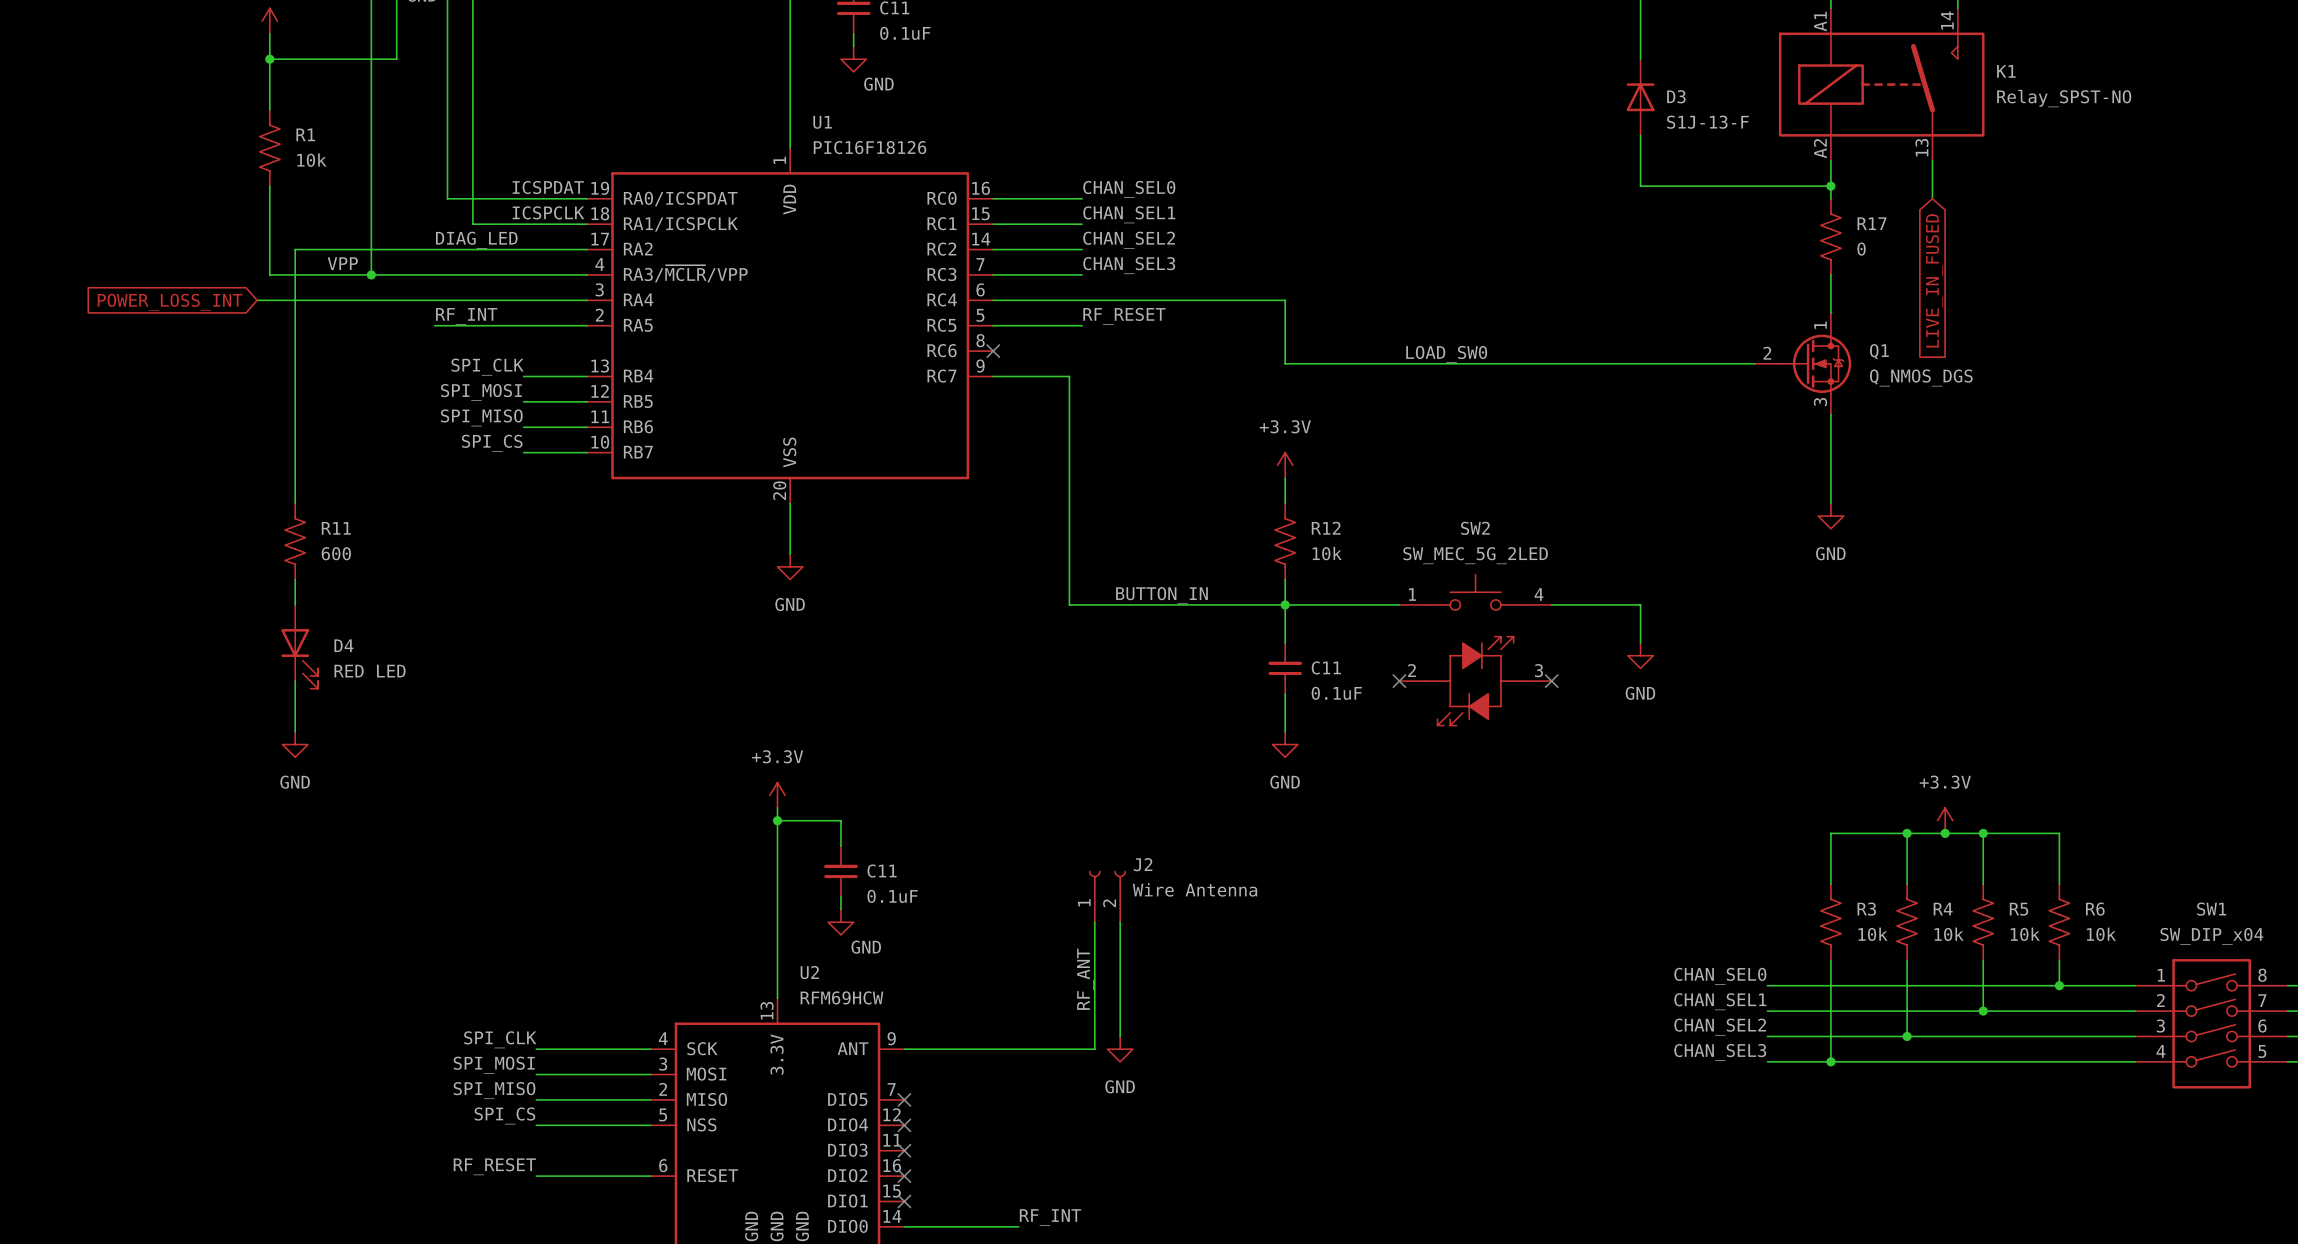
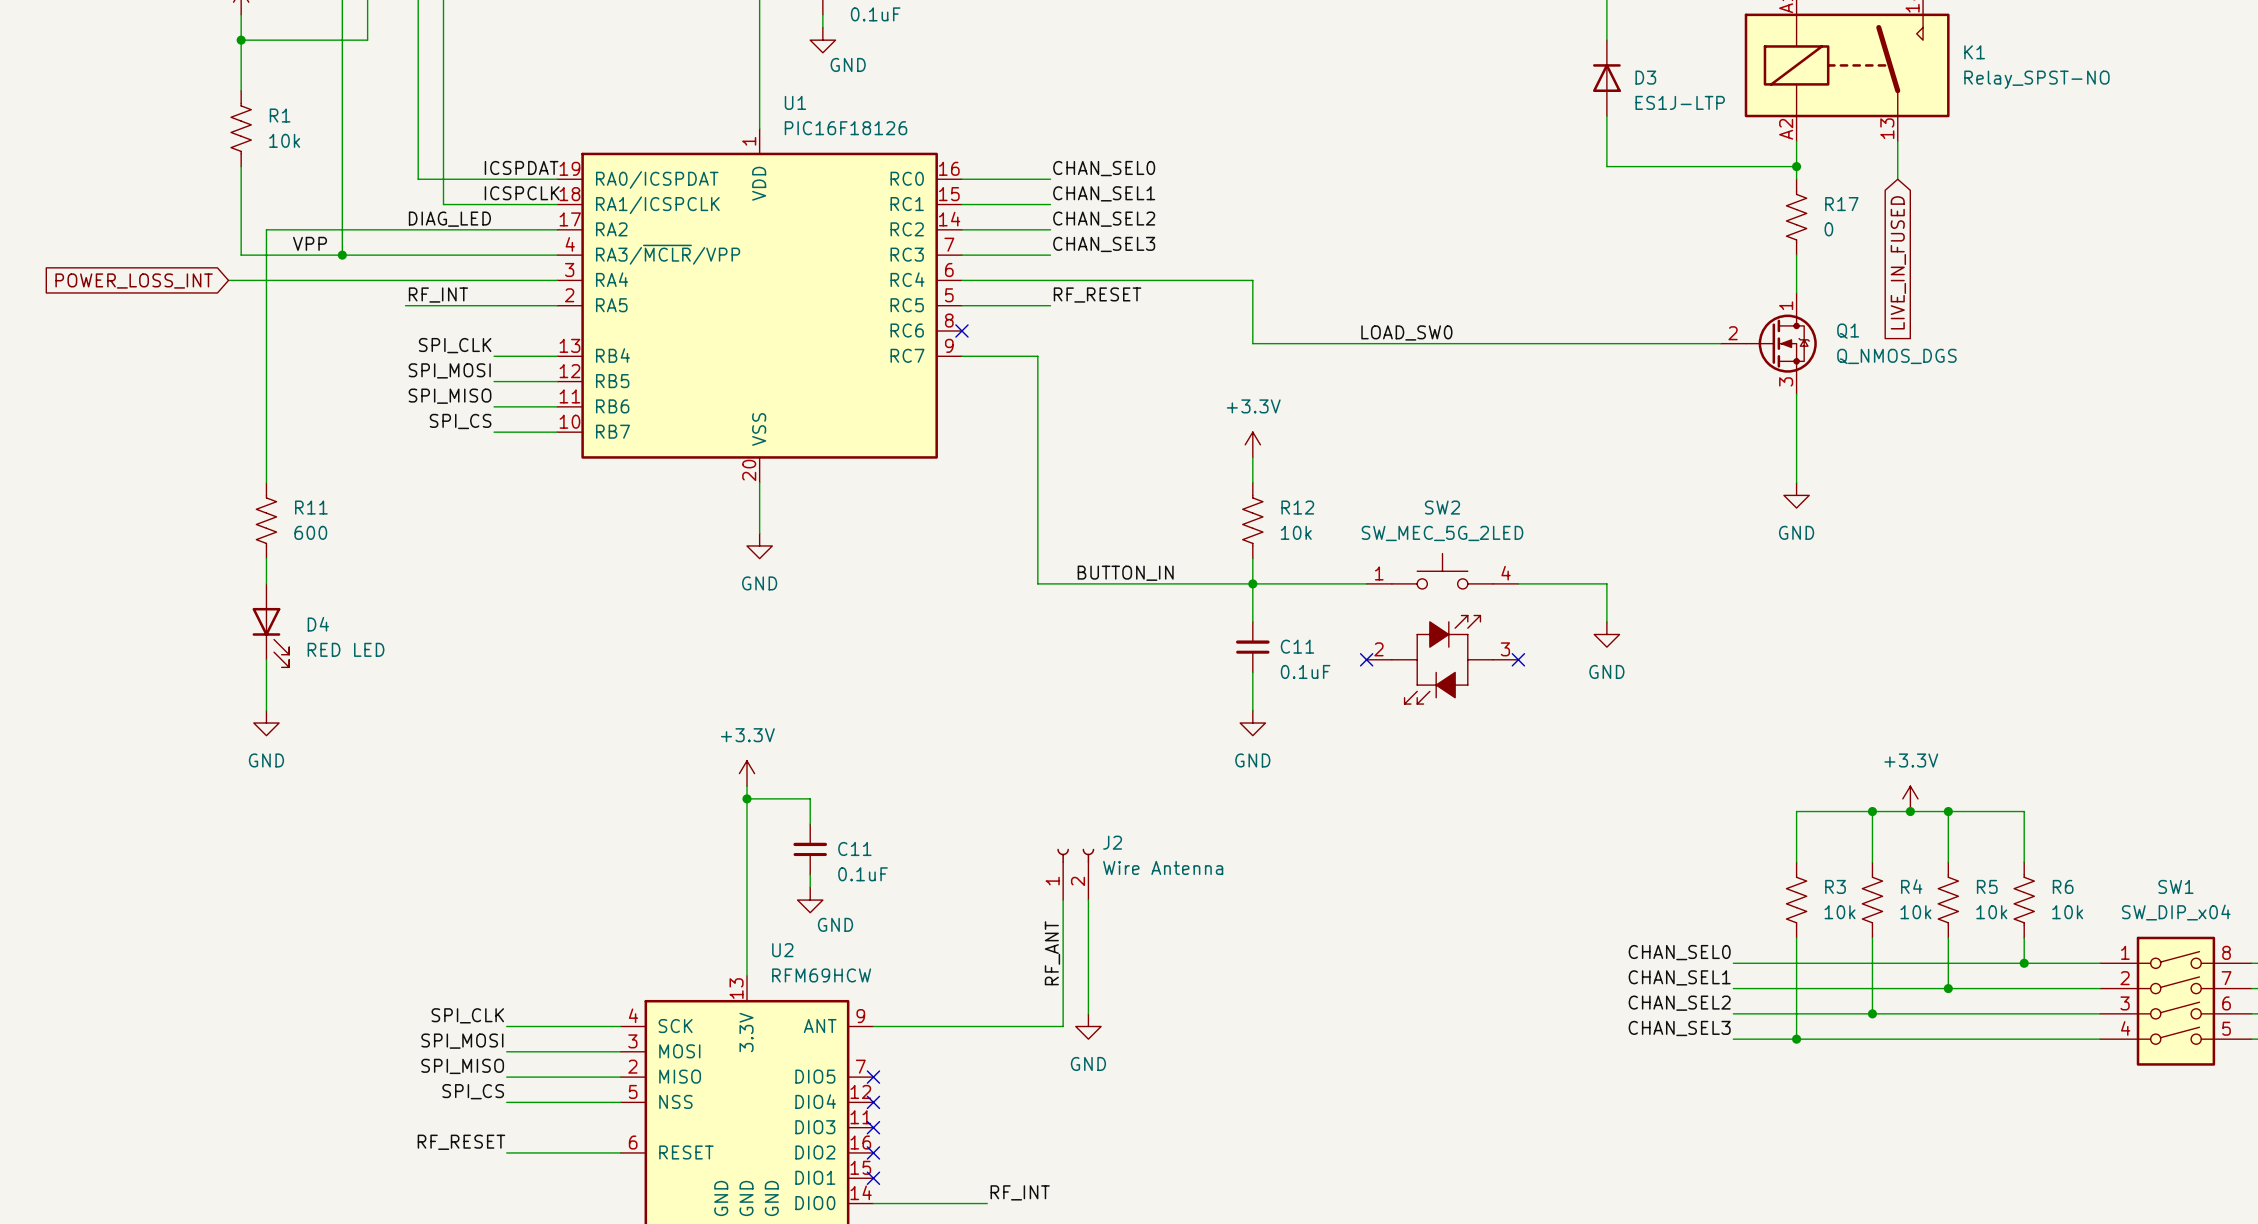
D3 value: S1J-13-F (1707, 122) -> ES1J-LTP (1680, 102)

